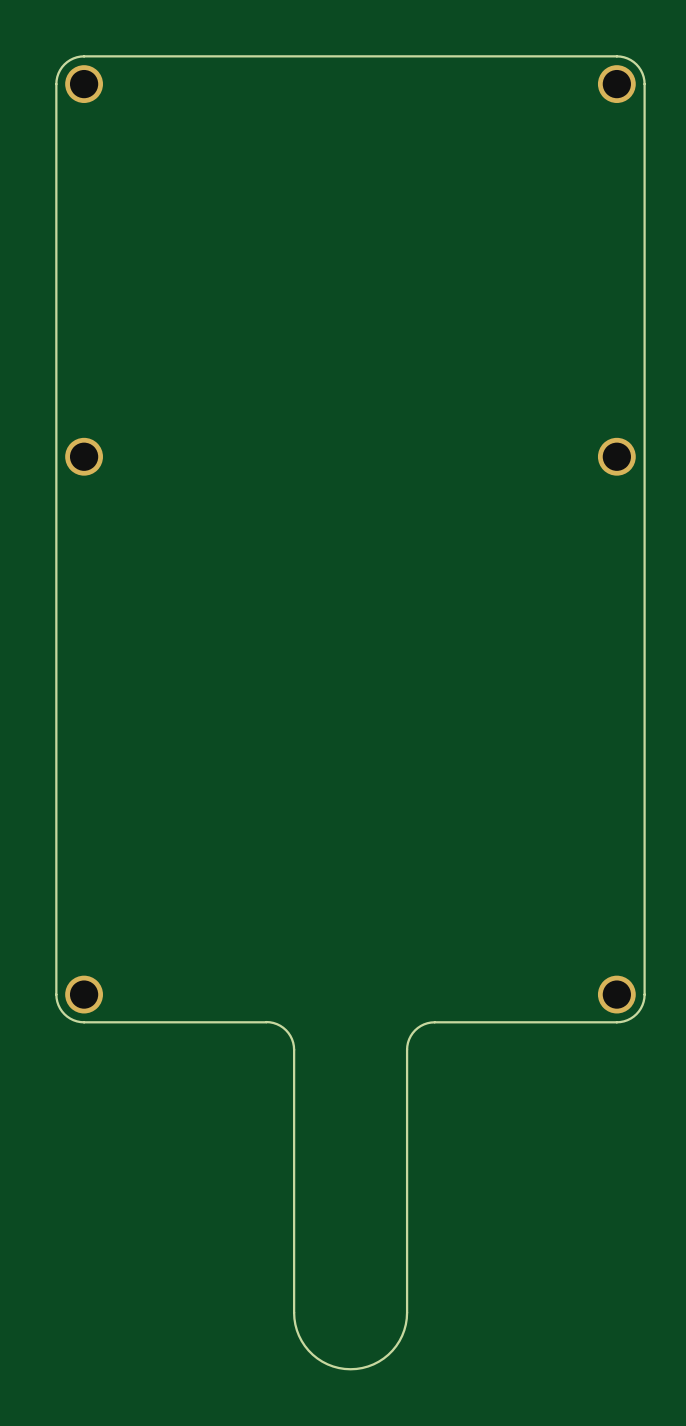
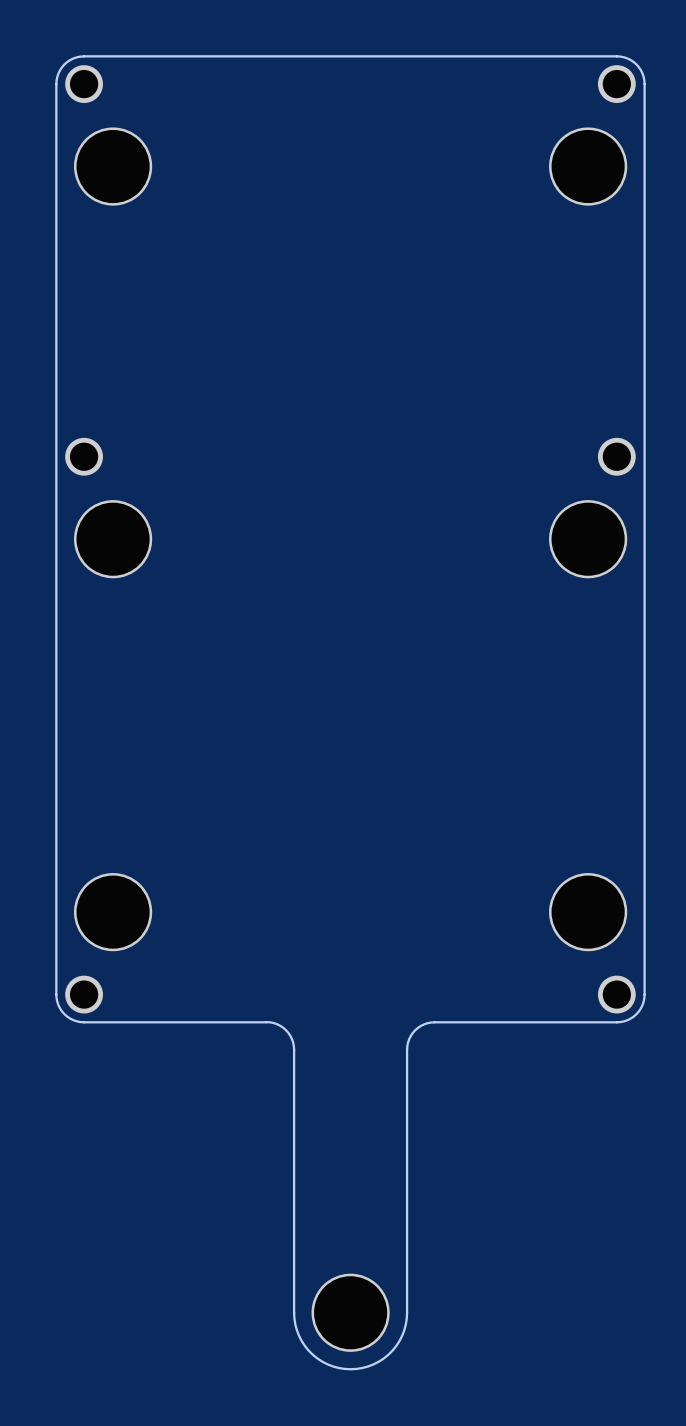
part: none -> (113, 166)
part: none -> (588, 166)
part: none -> (113, 539)
part: none -> (588, 539)
part: none -> (113, 912)
part: none -> (588, 912)
part: none -> (350, 1312)

